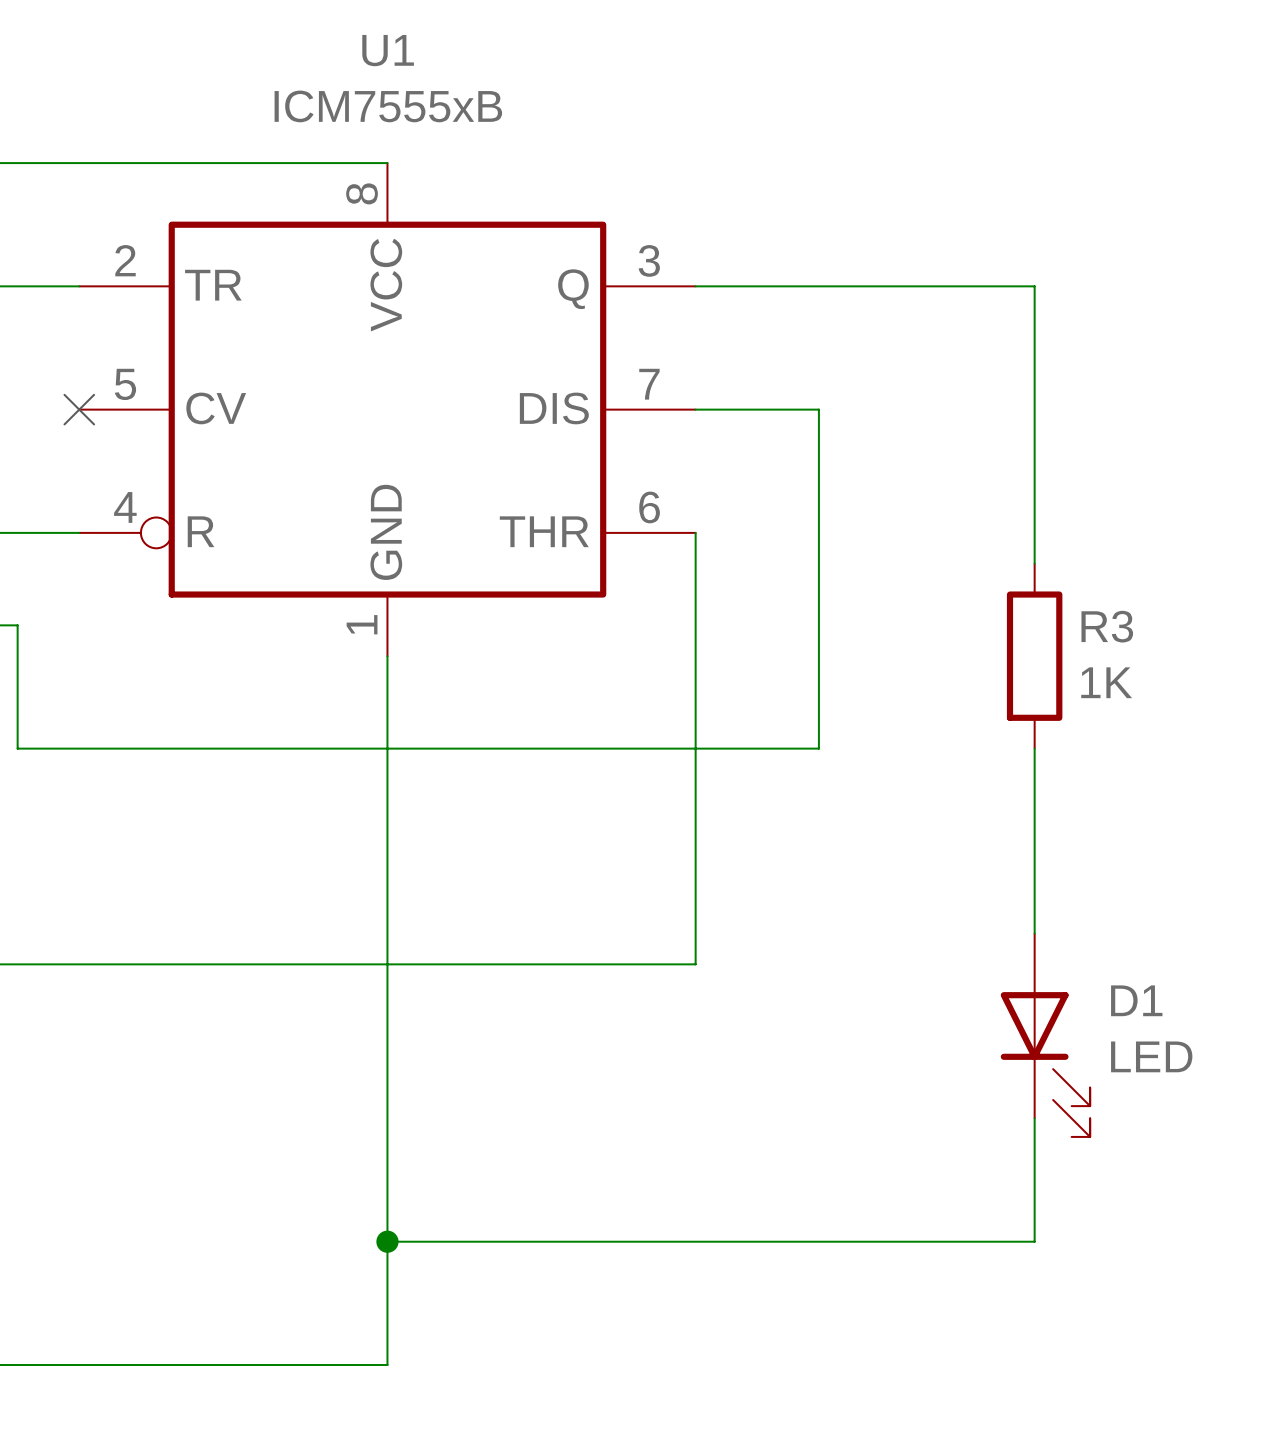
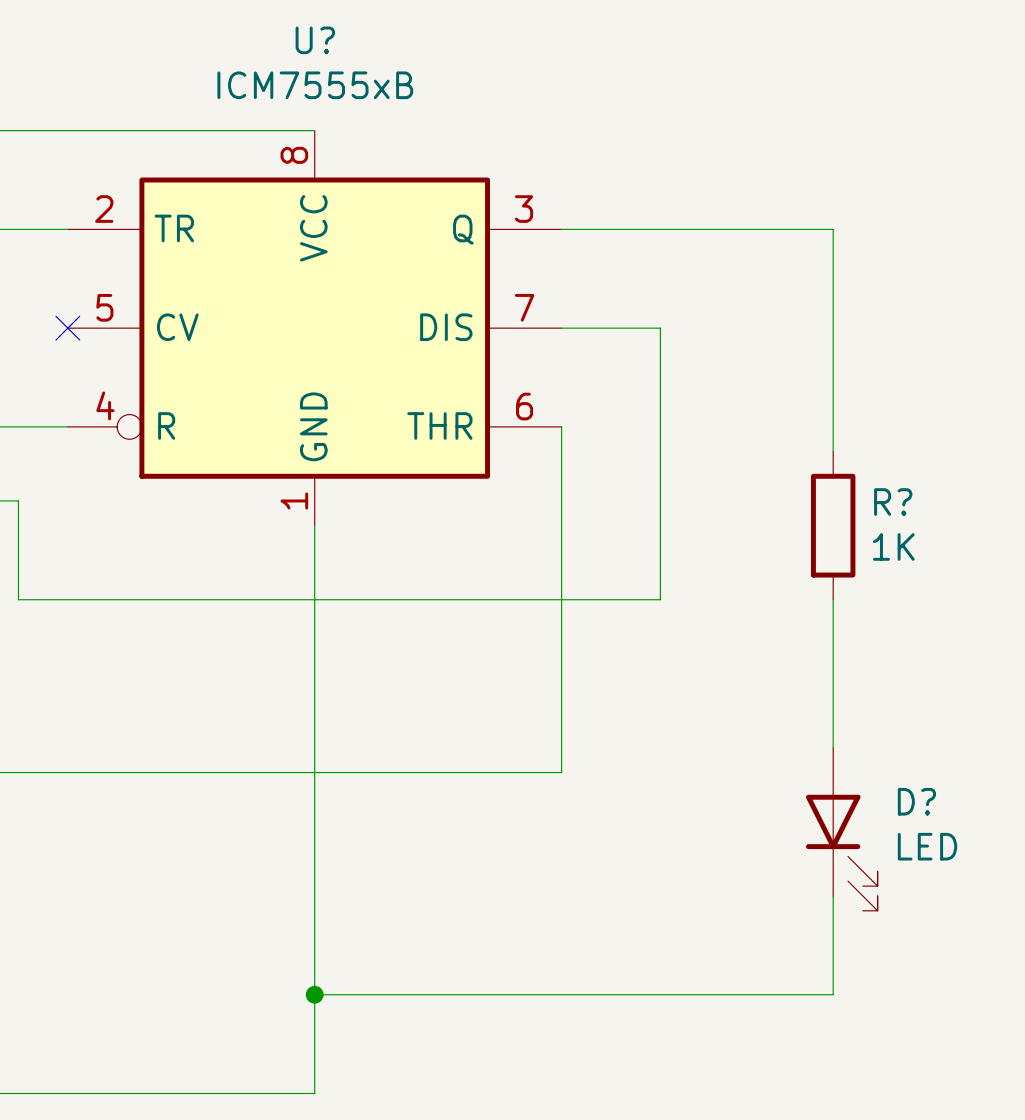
U1 name: U1 (388, 50) -> U? (315, 40)
R3 name: R3 (1107, 626) -> R? (893, 502)
D1 name: D1 (1136, 1000) -> D? (916, 801)

